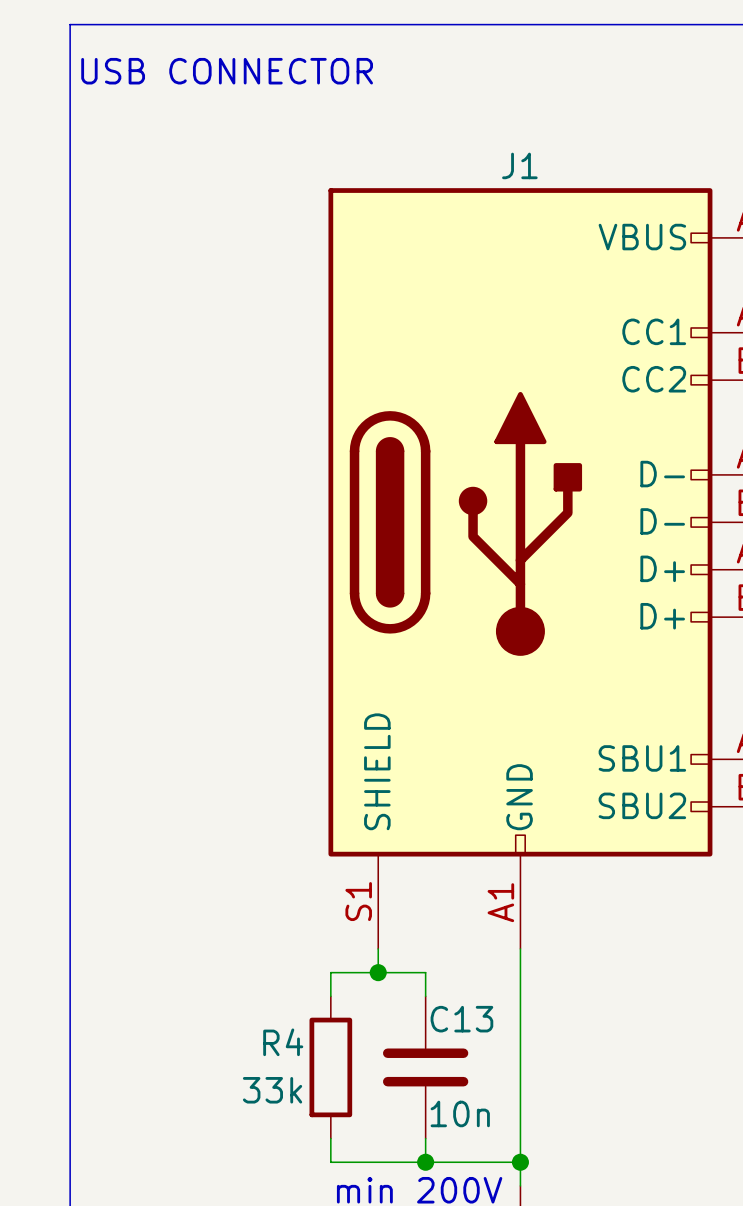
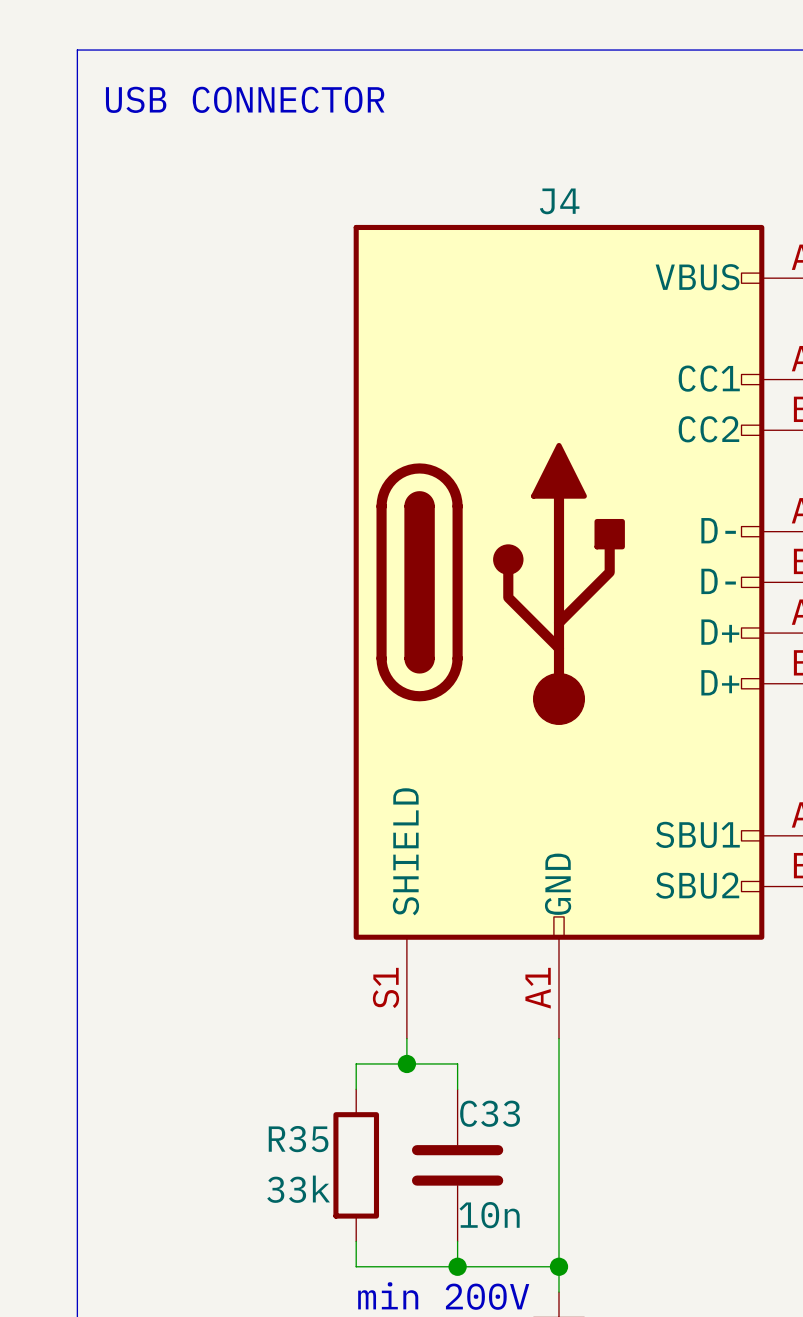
J1 name: J1 (519, 165) -> J4 (559, 201)
C13 name: C13 (461, 1019) -> C33 (490, 1113)
R4 name: R4 (283, 1042) -> R35 (298, 1139)

